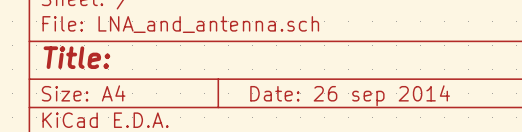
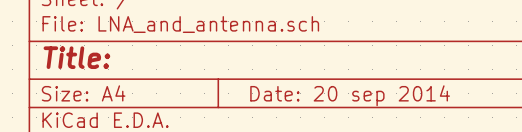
title block: Date: 26 sep 2014 (350, 95) -> Date: 20 sep 2014 (350, 95)

